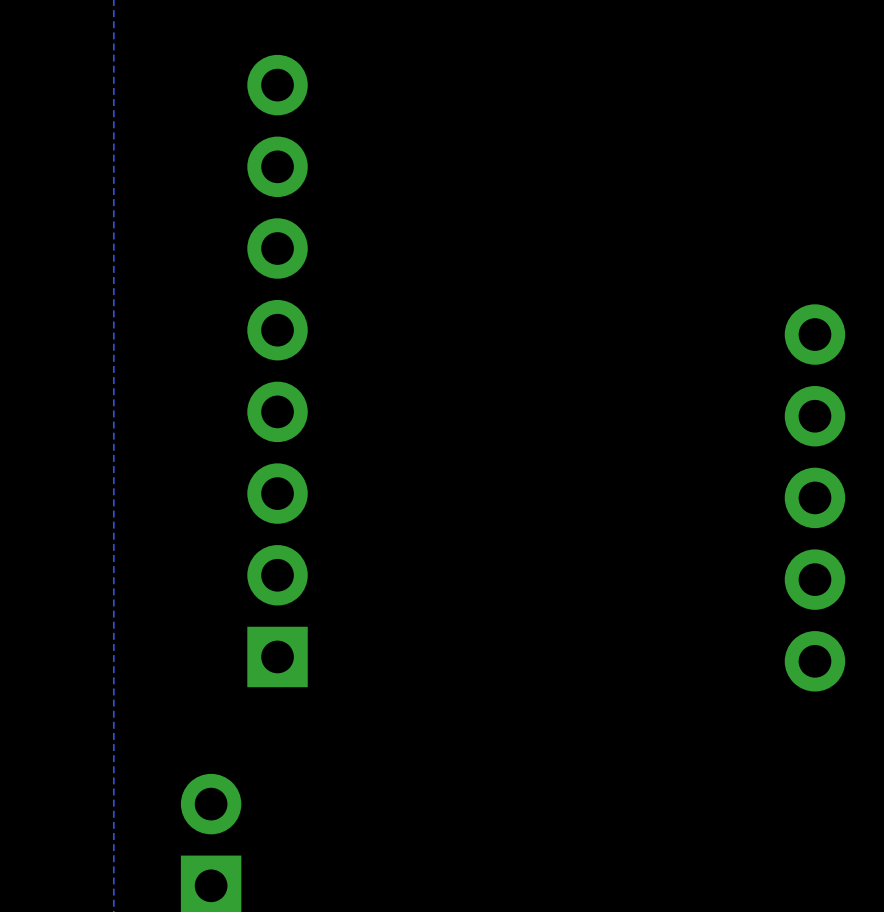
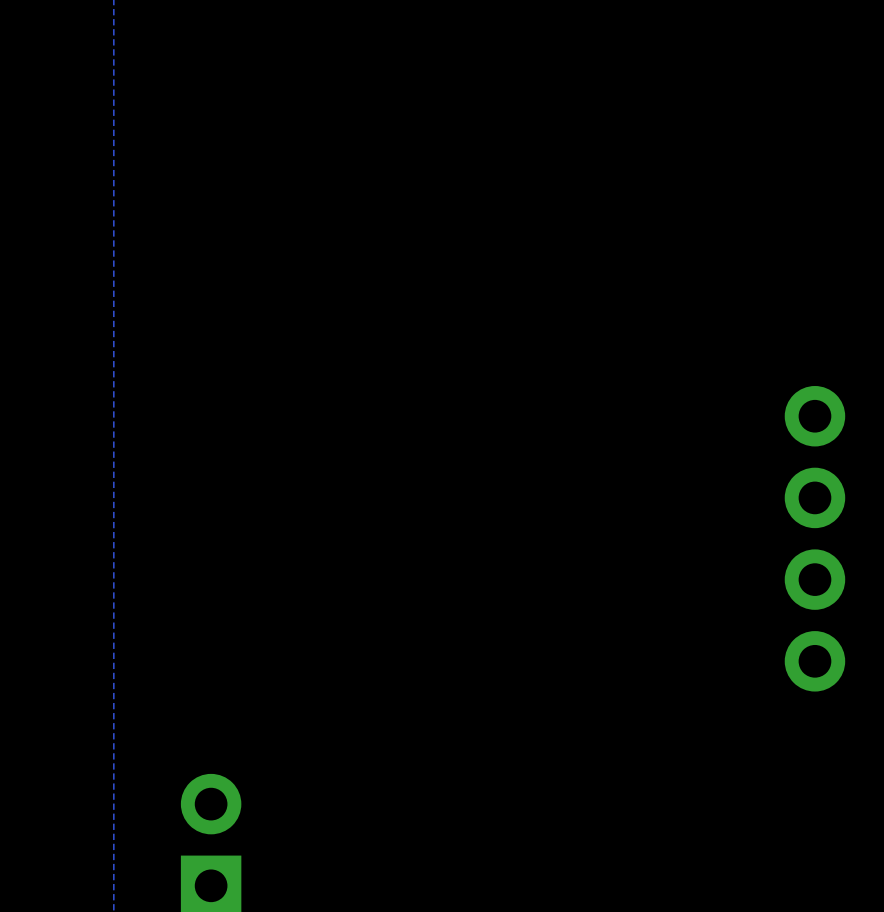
part: (814, 334) -> none
part: (277, 371) -> none

